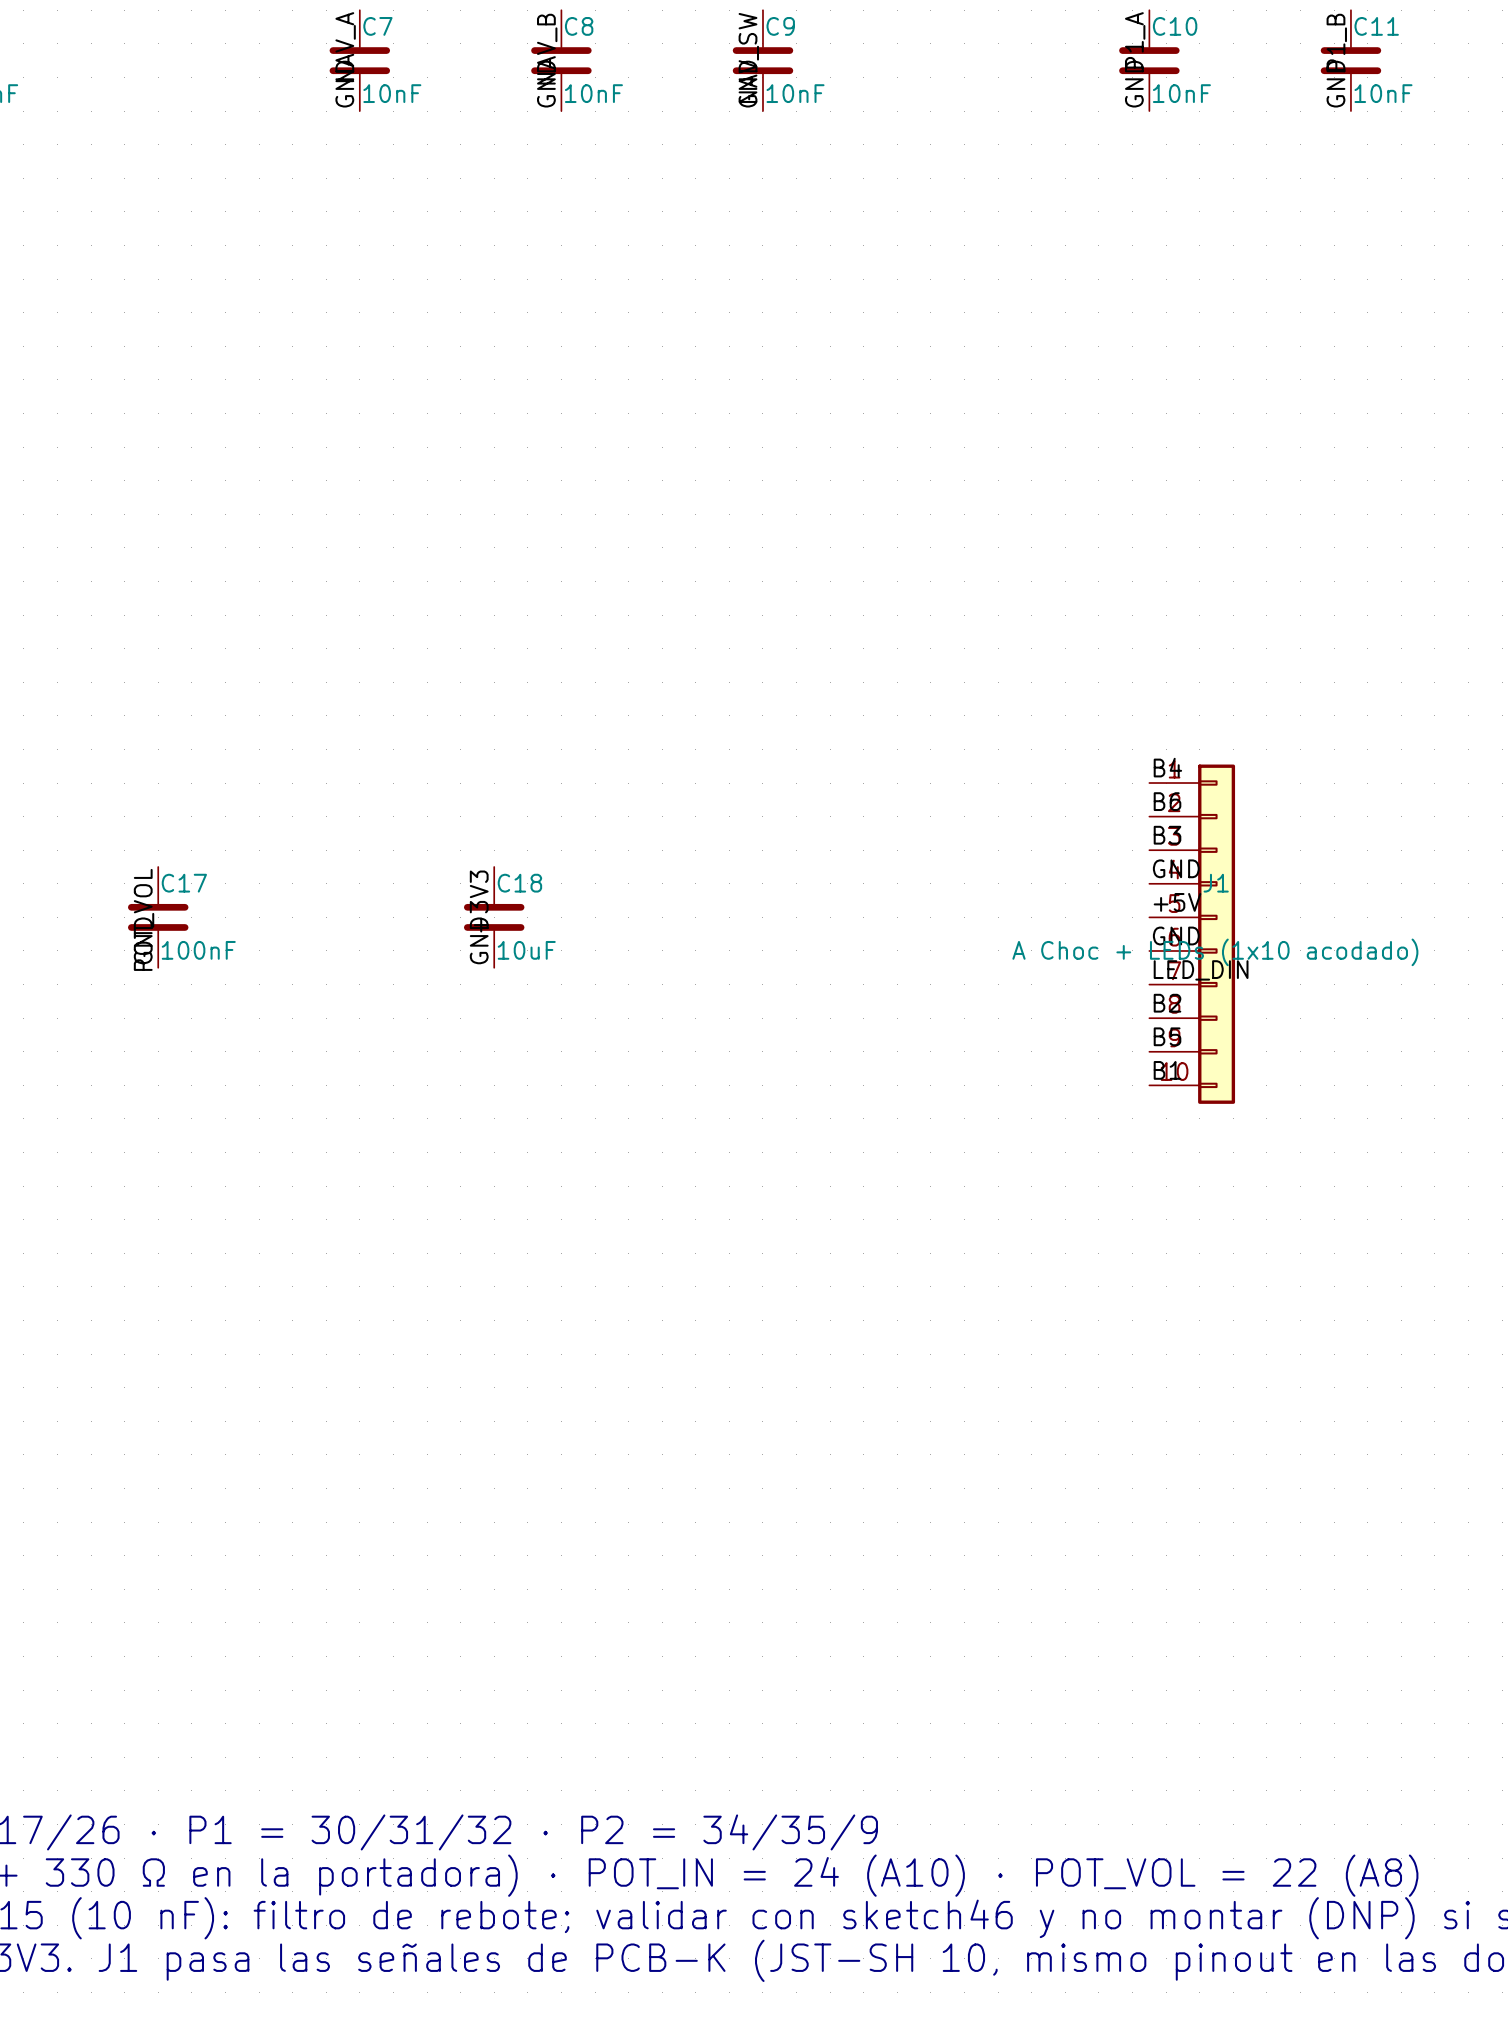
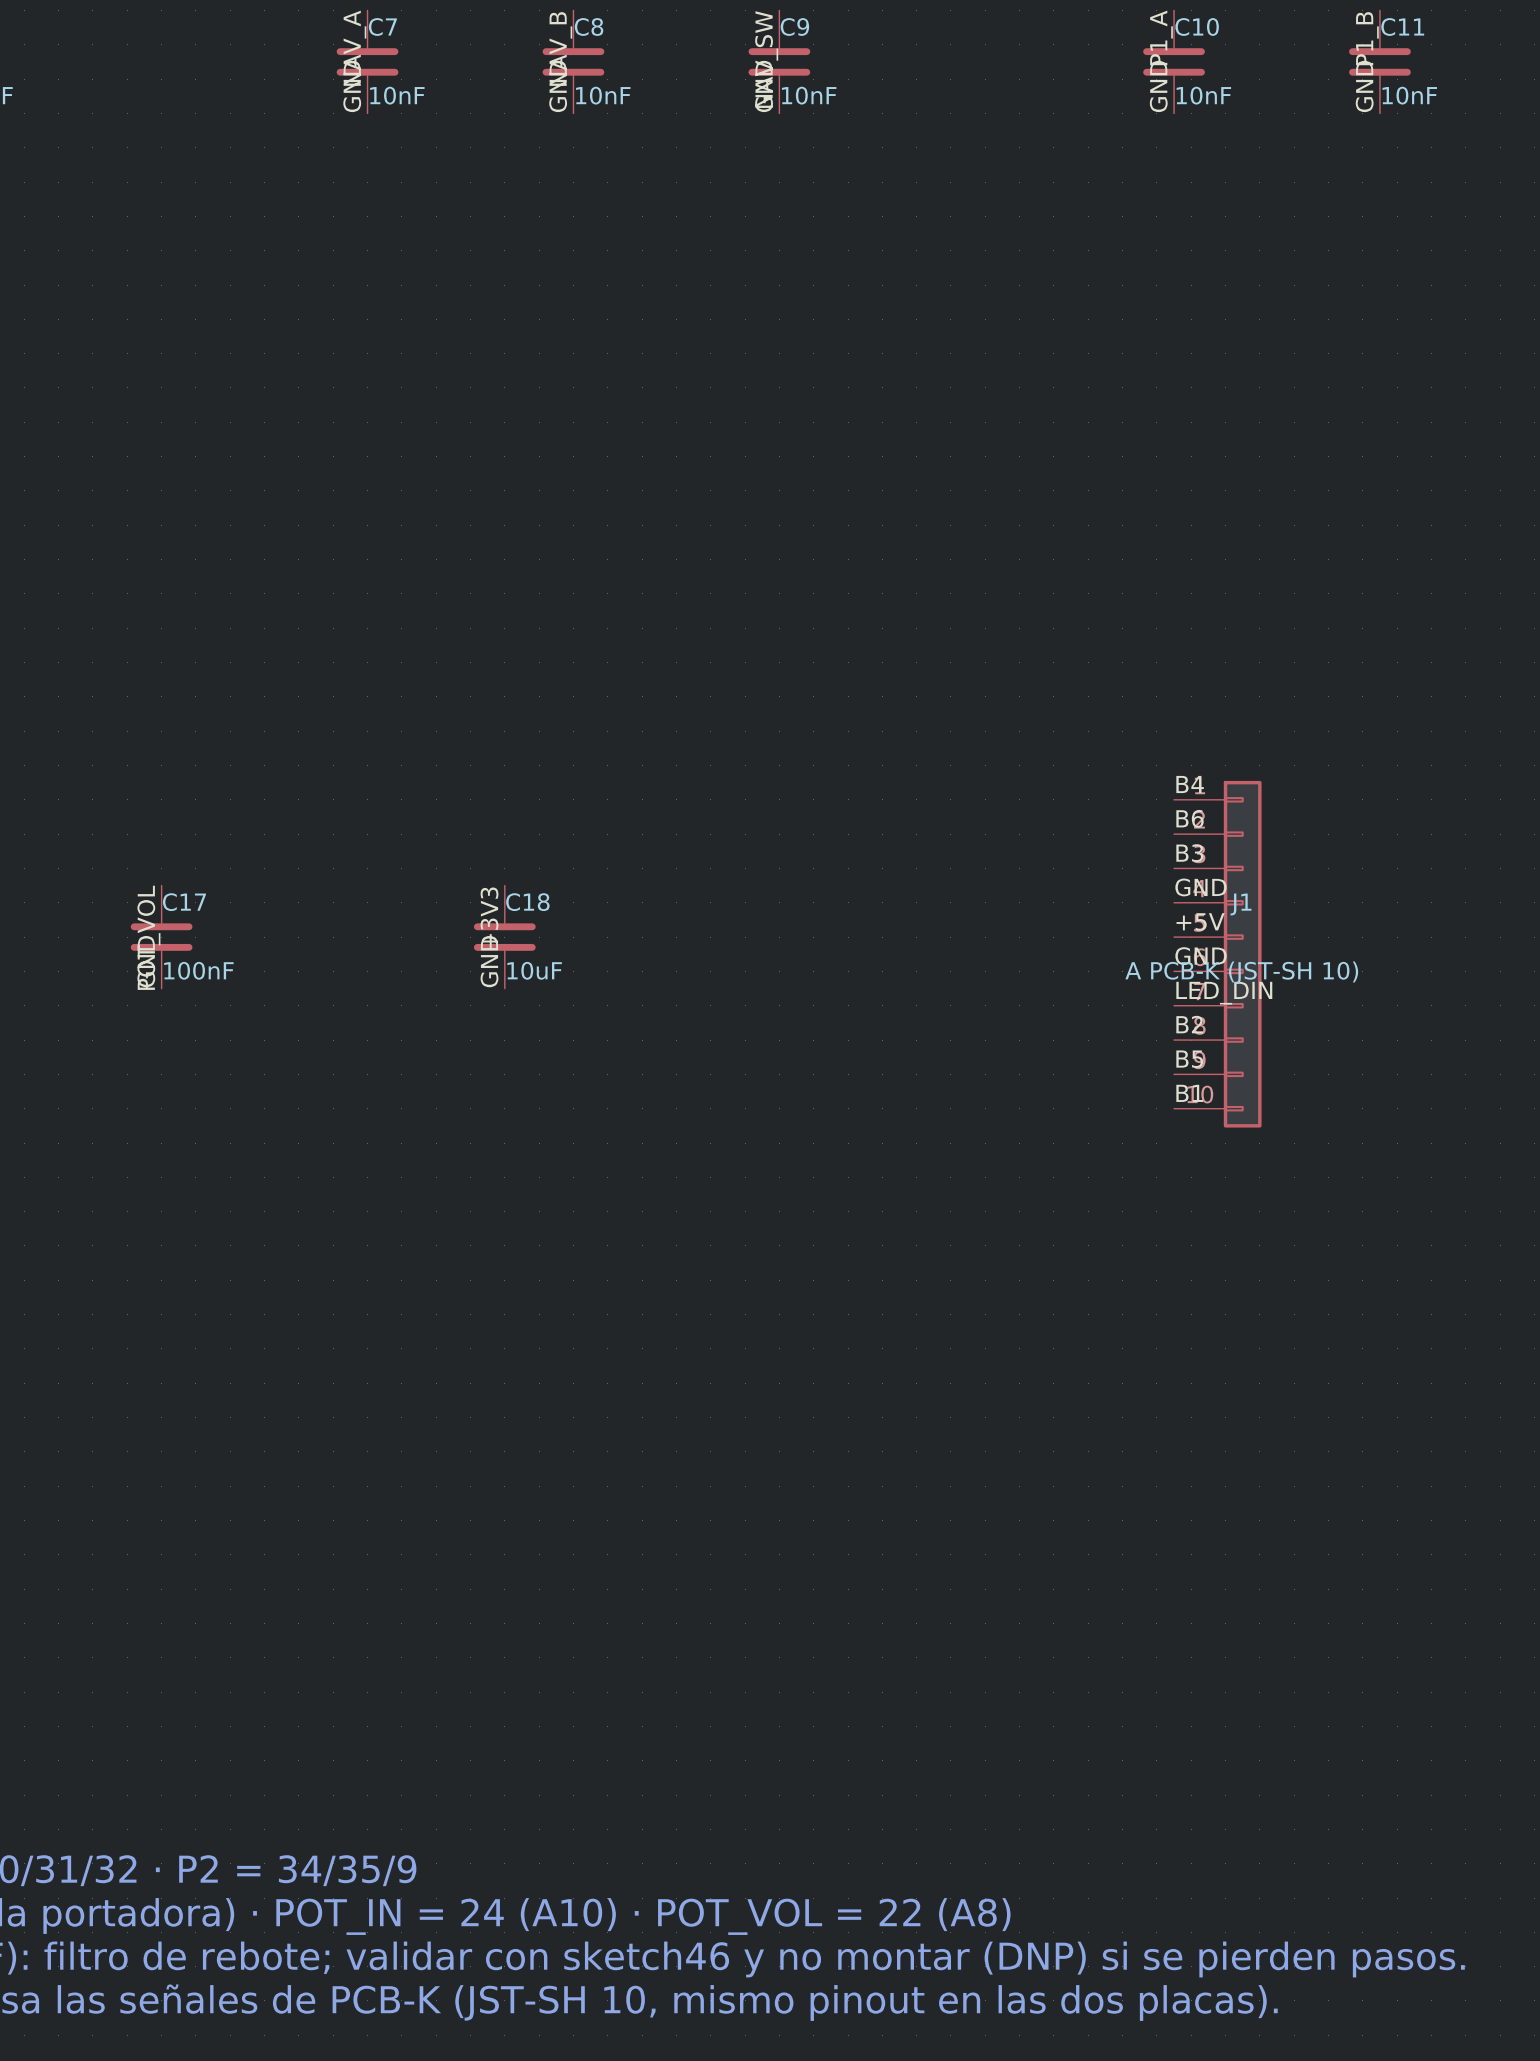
J1 value: A Choc + LEDs (1x10 acodado) (1215, 952) -> A PCB-K (JST-SH 10) (1241, 972)

